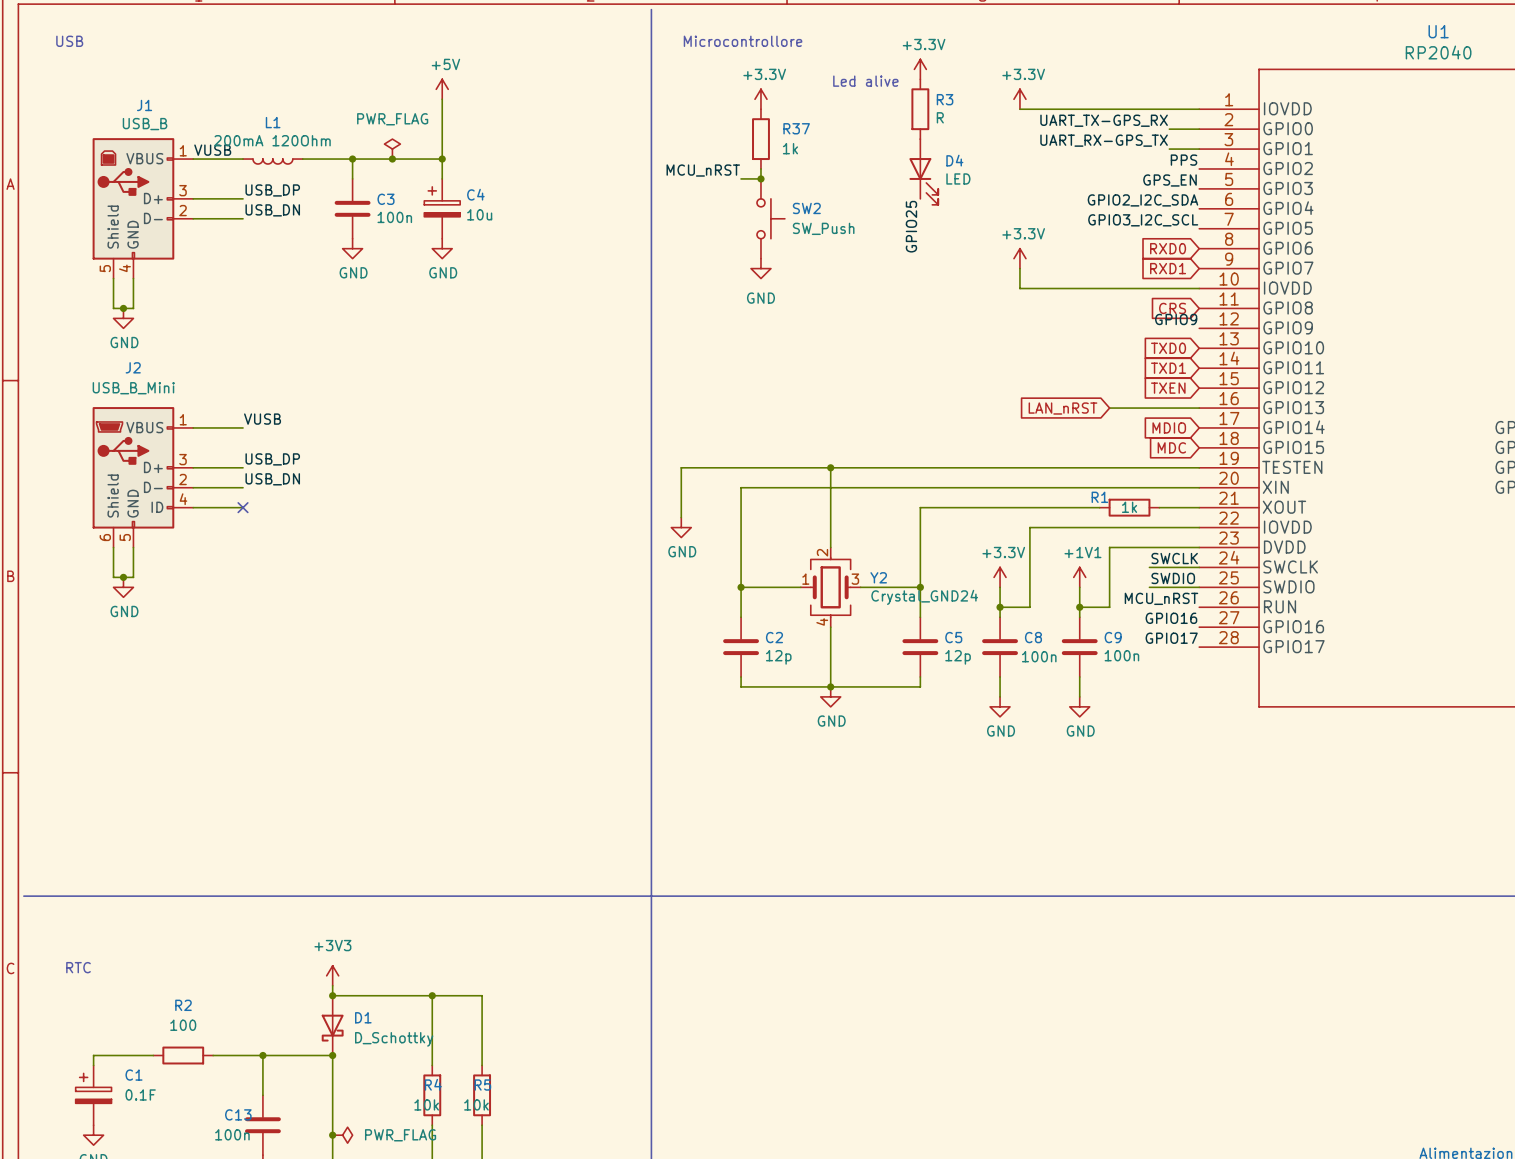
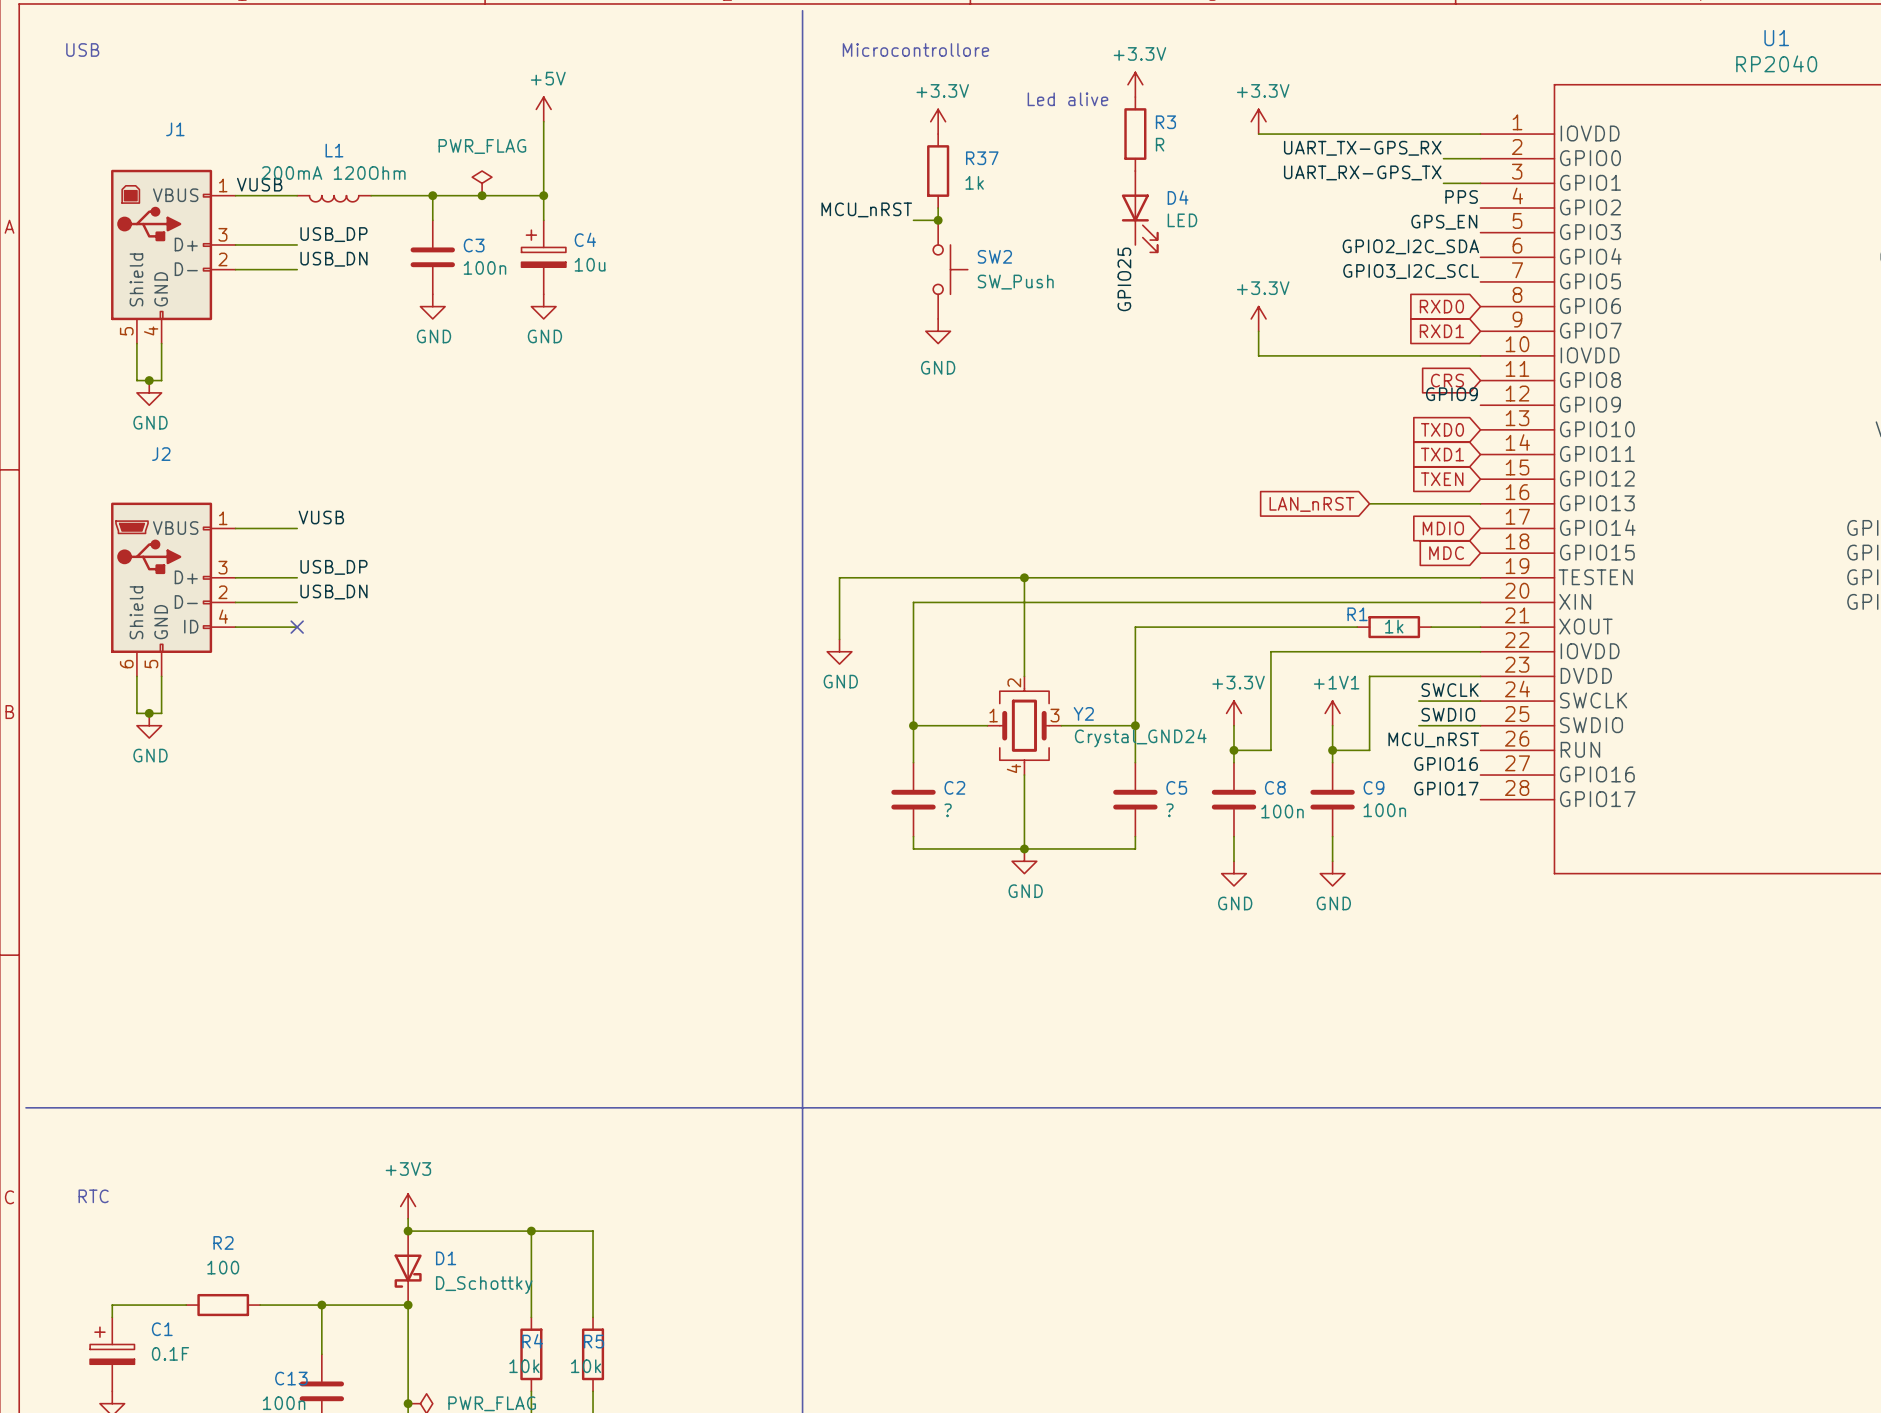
J1 value: USB_B (145, 124) -> none
J2 value: USB_B_Mini (133, 388) -> none
C2 value: 12p (778, 657) -> ? (948, 810)
C5 value: 12p (958, 657) -> ? (1169, 810)

